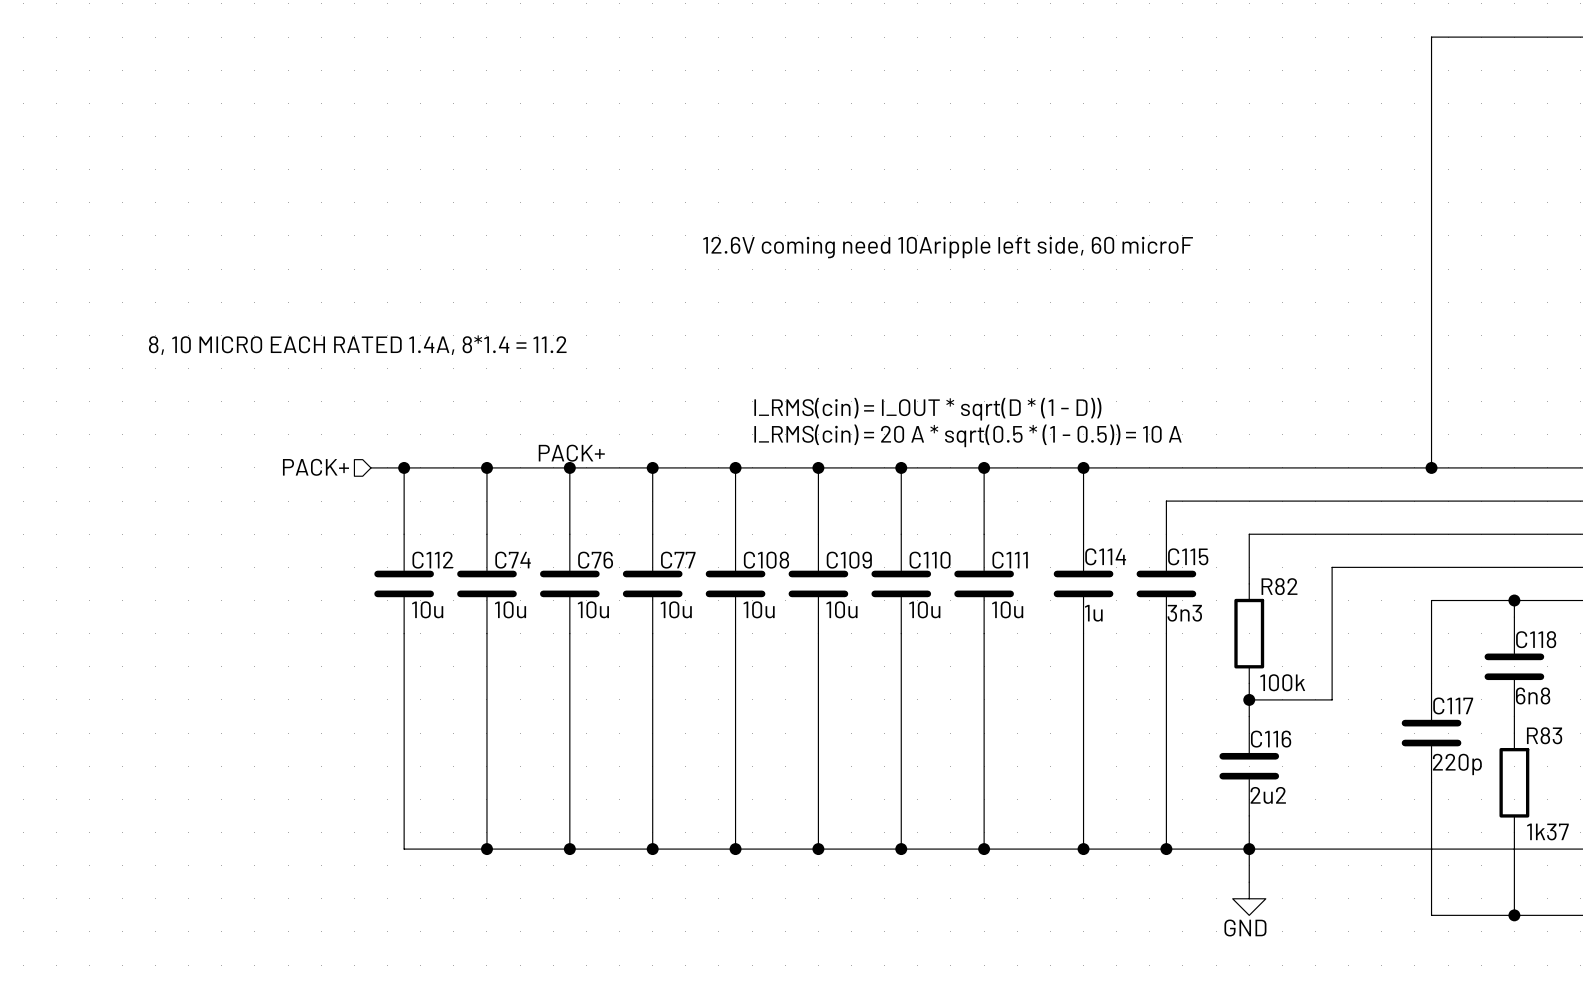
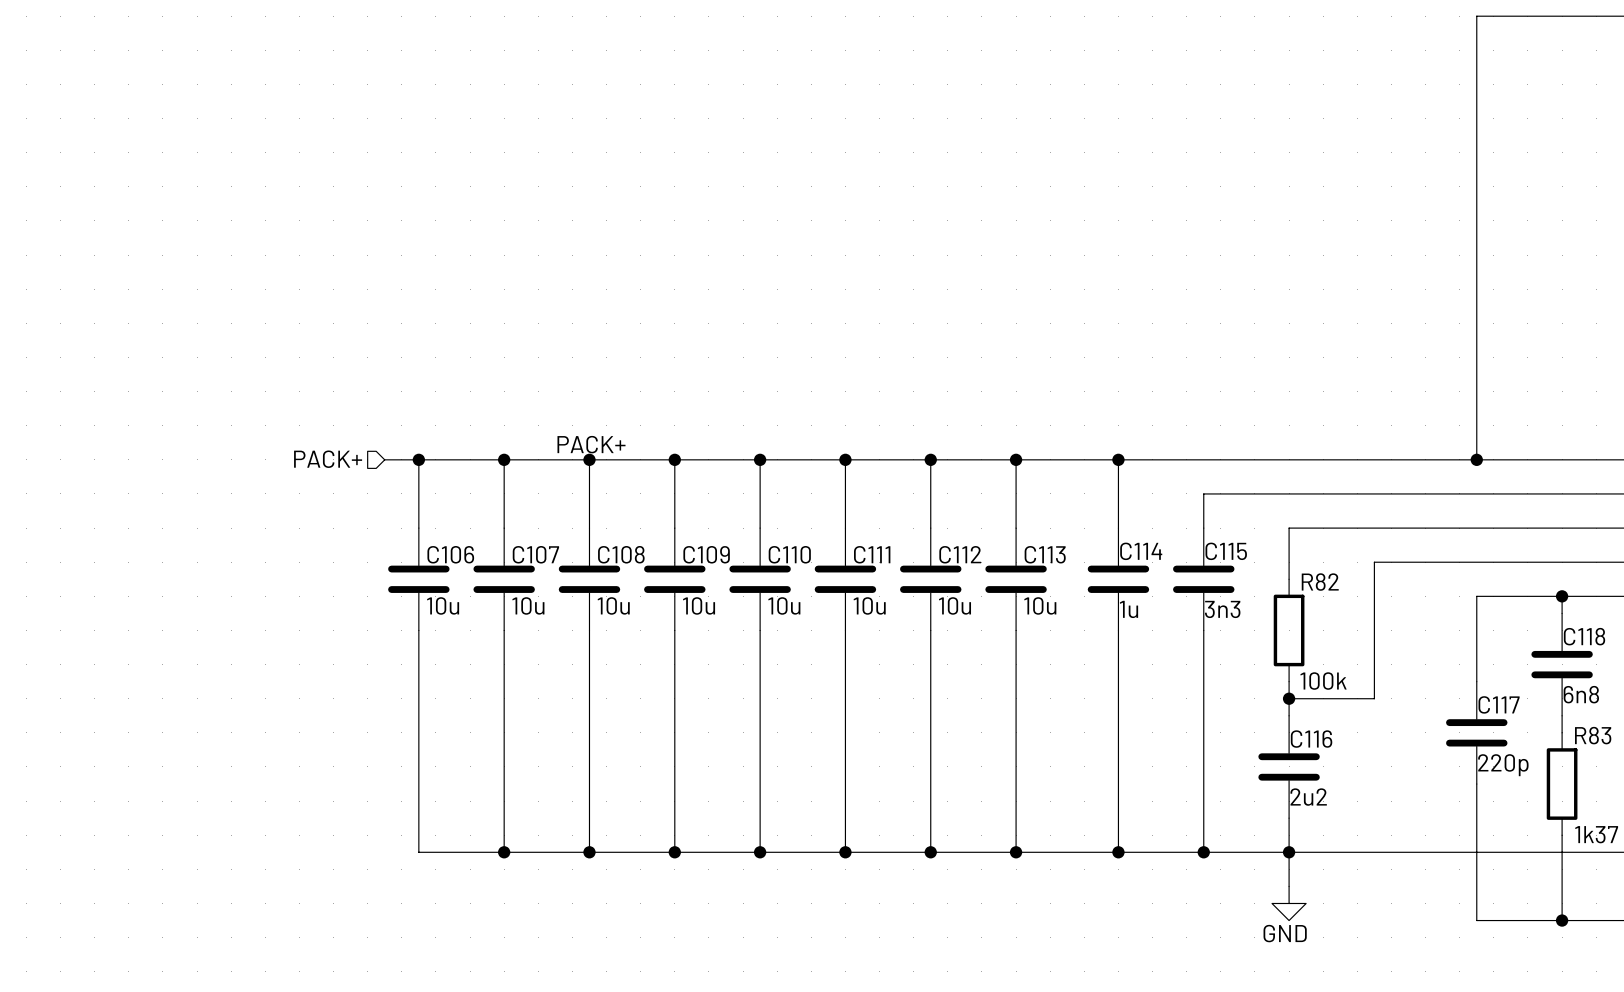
text: 12.6V coming need 10Aripple left side, 60 microF (948, 247) -> none
text: 8, 10 MICRO EACH RATED 1.4A, 8*1.4 = 11.2 (357, 345) -> none
text: I_RMS(cin) = I_OUT * sqrt(D * (1 - D)) (927, 409) -> none
text: I_RMS(cin) = 20 A * sqrt(0.5 * (1 - 0.5)) = 10 A (967, 435) -> none
C112 name: C112 (432, 560) -> C106 (450, 554)
C74 name: C74 (513, 560) -> C107 (535, 554)
C76 name: C76 (595, 560) -> C108 (621, 554)
C77 name: C77 (678, 560) -> C109 (706, 554)
C108 name: C108 (766, 560) -> C110 (789, 554)
C109 name: C109 (849, 560) -> C111 (872, 554)
C110 name: C110 (930, 560) -> C112 (960, 554)
C111 name: C111 (1010, 560) -> C113 (1045, 554)

